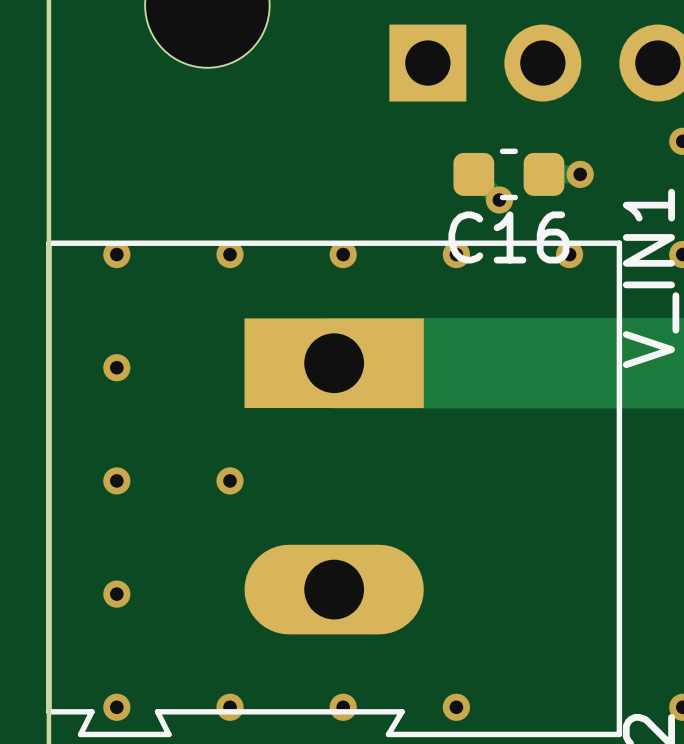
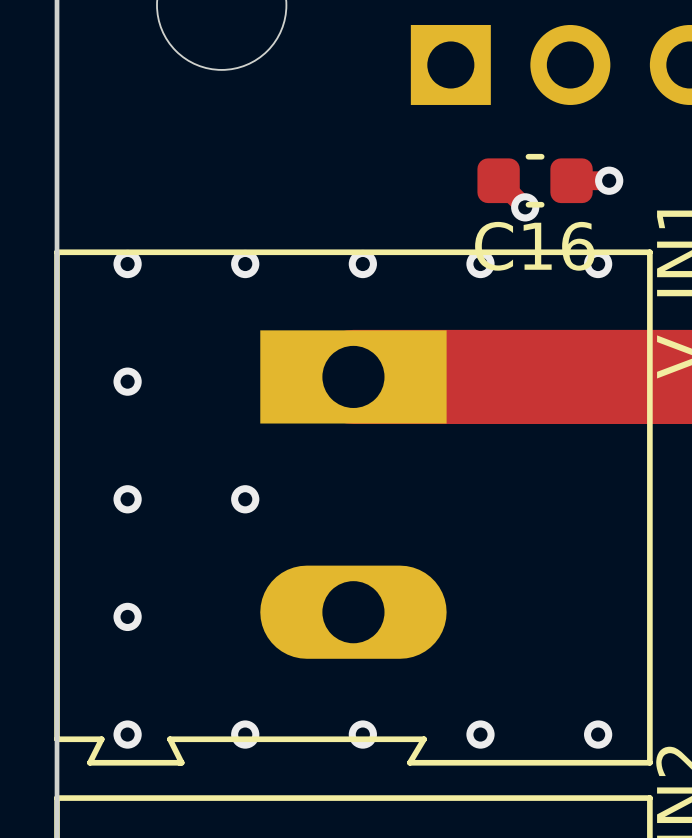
via: none -> (598, 734)

